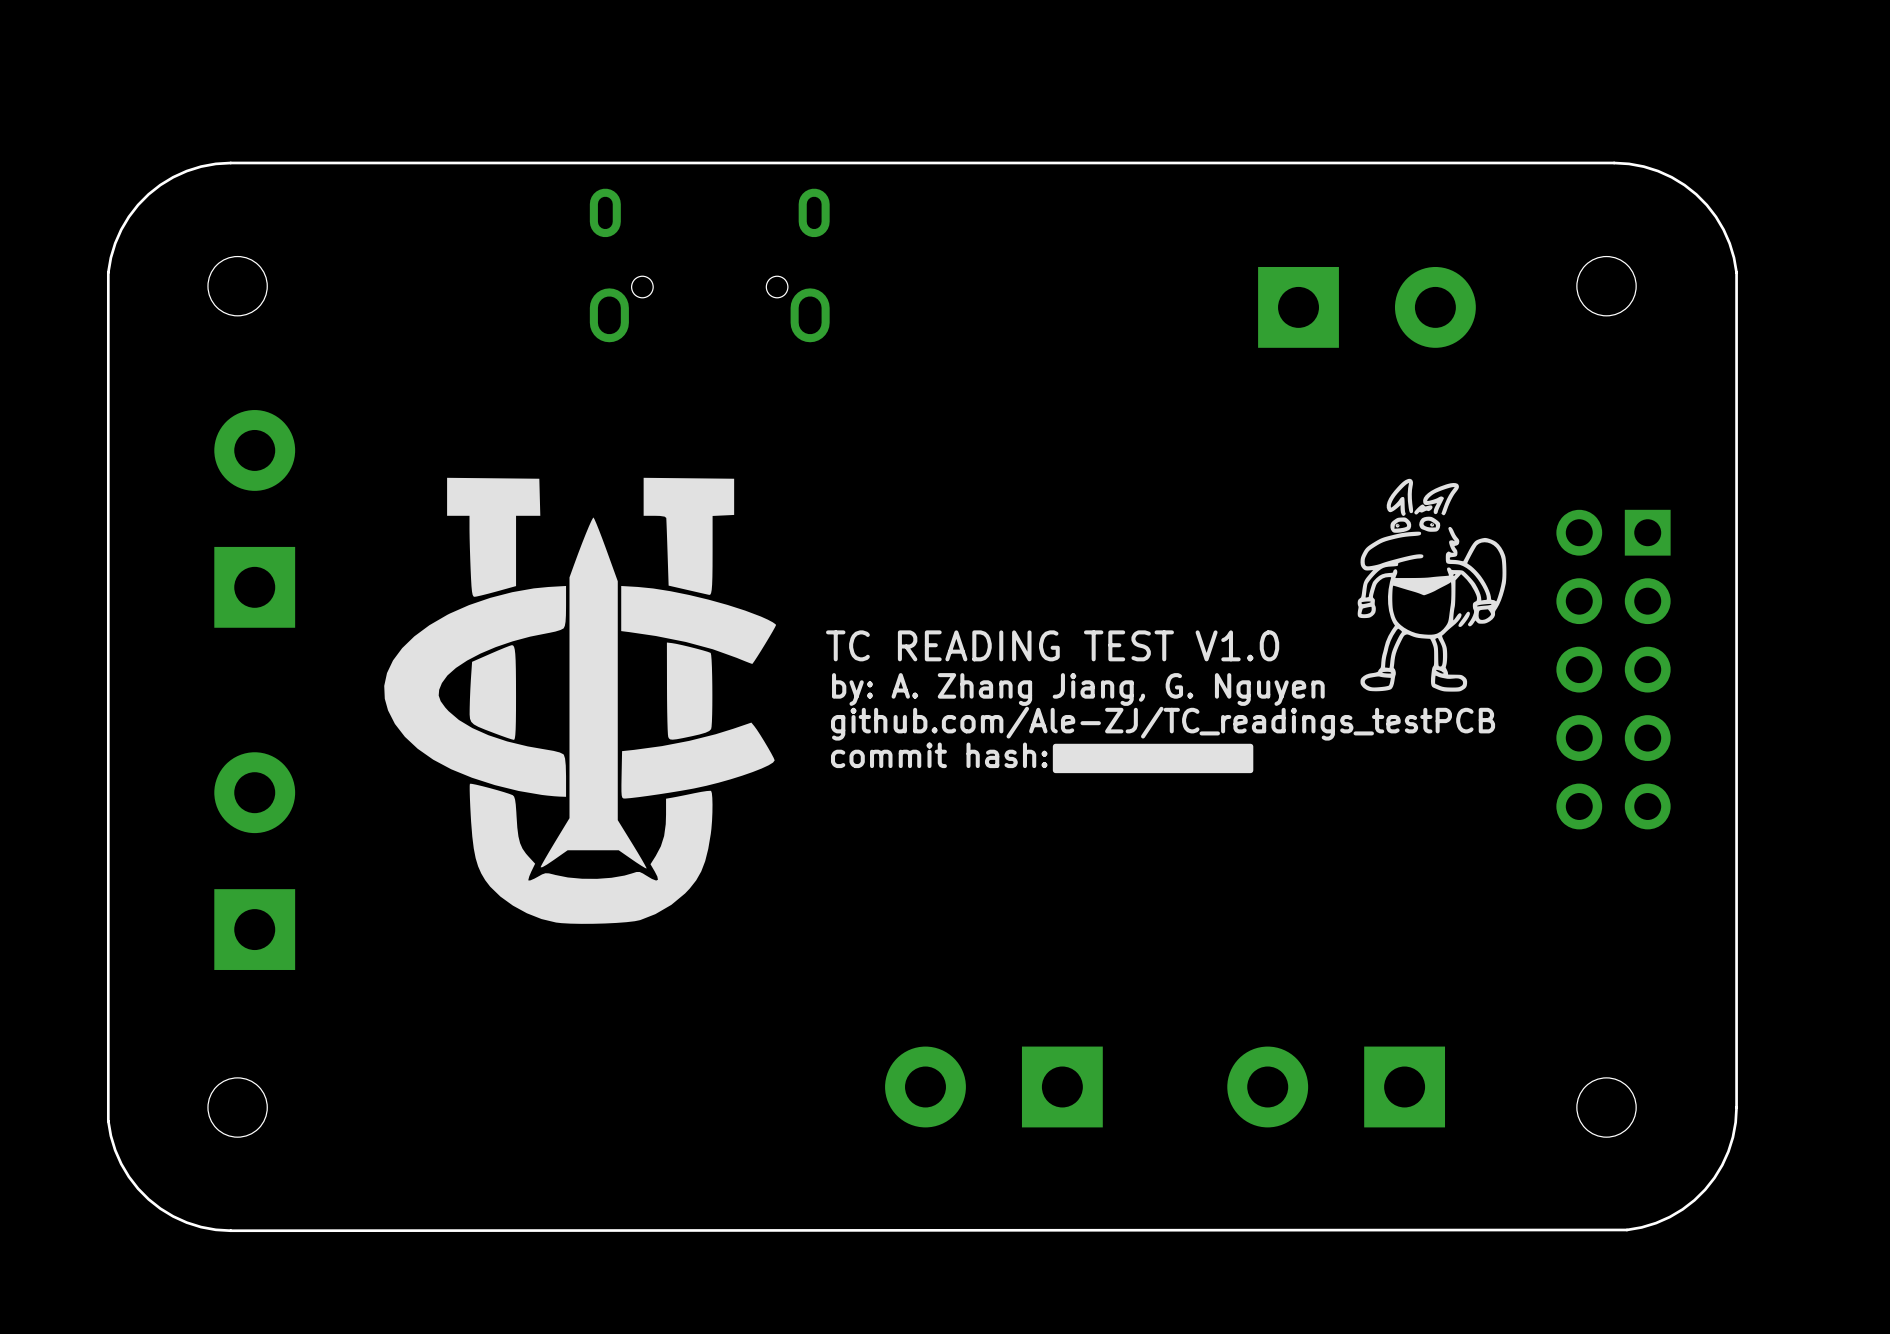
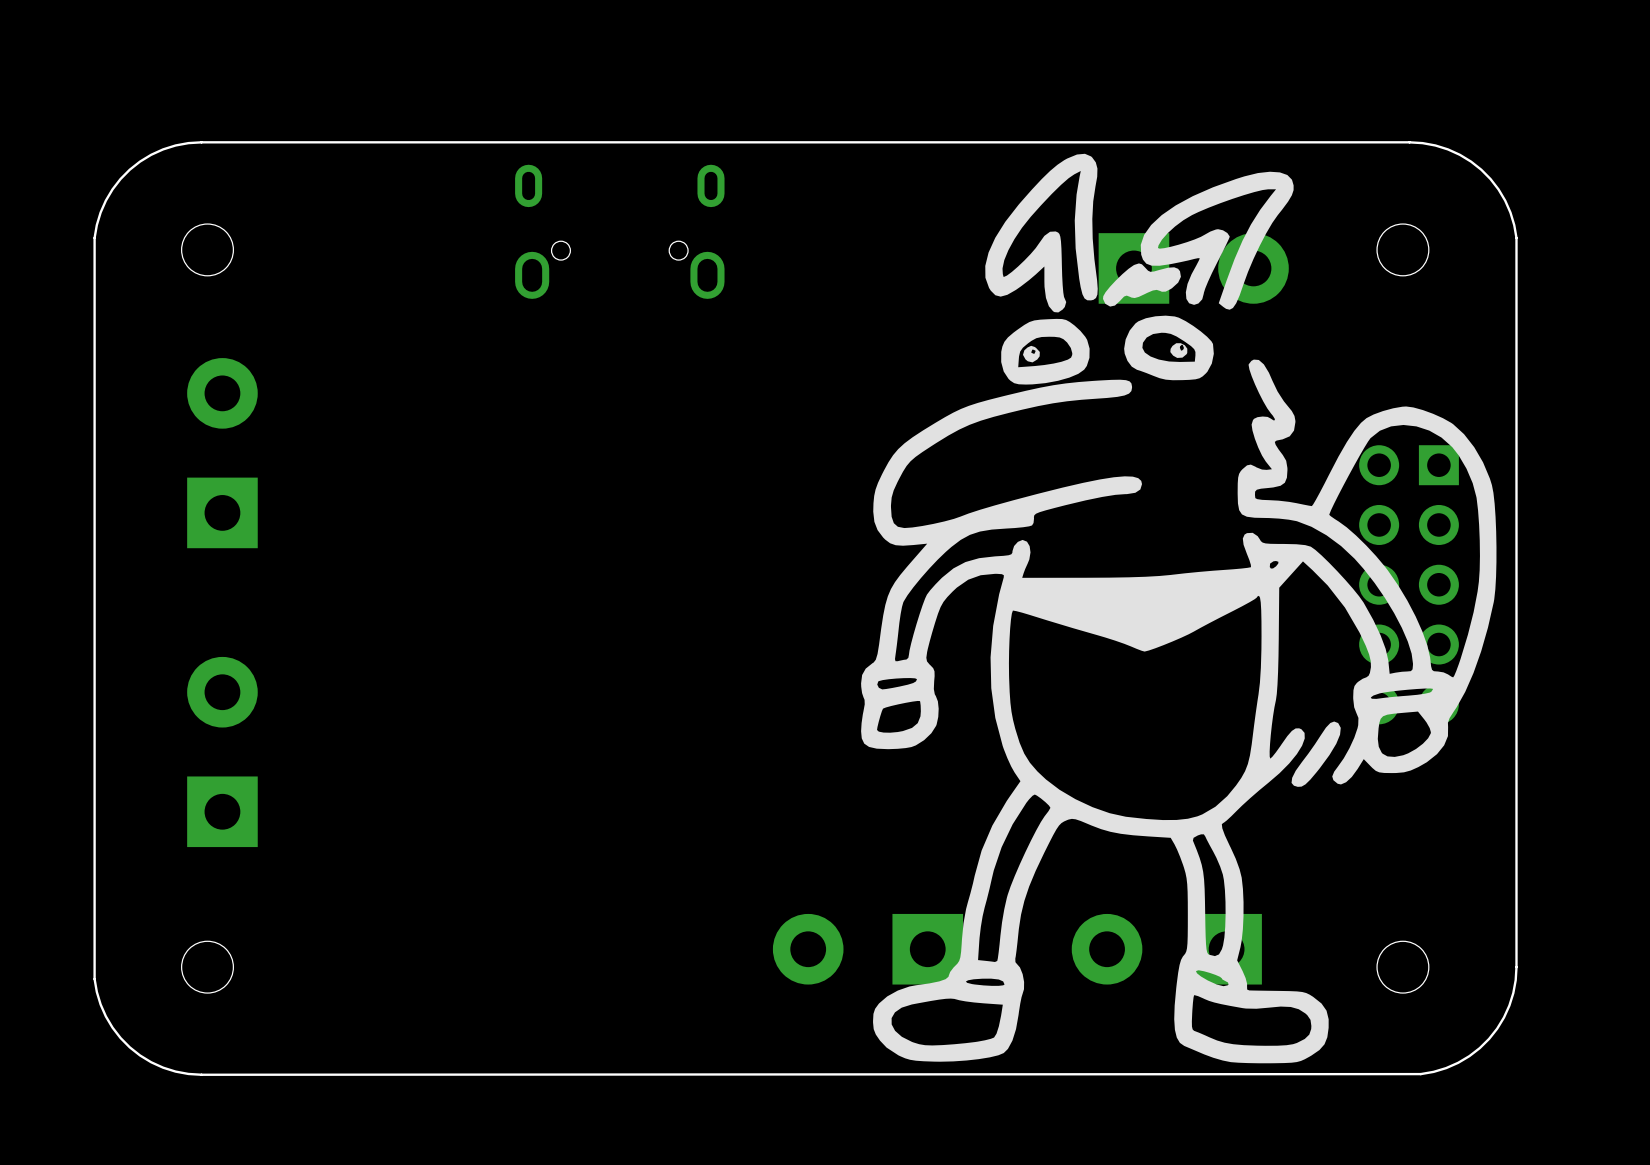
drawing: none -> [861, 153, 1497, 1064]
drawing: [384, 477, 777, 924] -> none
drawing: [1357, 478, 1507, 692] -> none
text: TC READING TEST V1.0 (1052, 645) -> none
text: by: A. Zhang Jiang, G. Nguyen (1078, 689) -> none
text: github.com/Ale-ZJ/TC_readings_testPCB (1163, 723) -> none
drawing: [1052, 743, 1254, 774] -> none
text: commit hash: (939, 755) -> none

